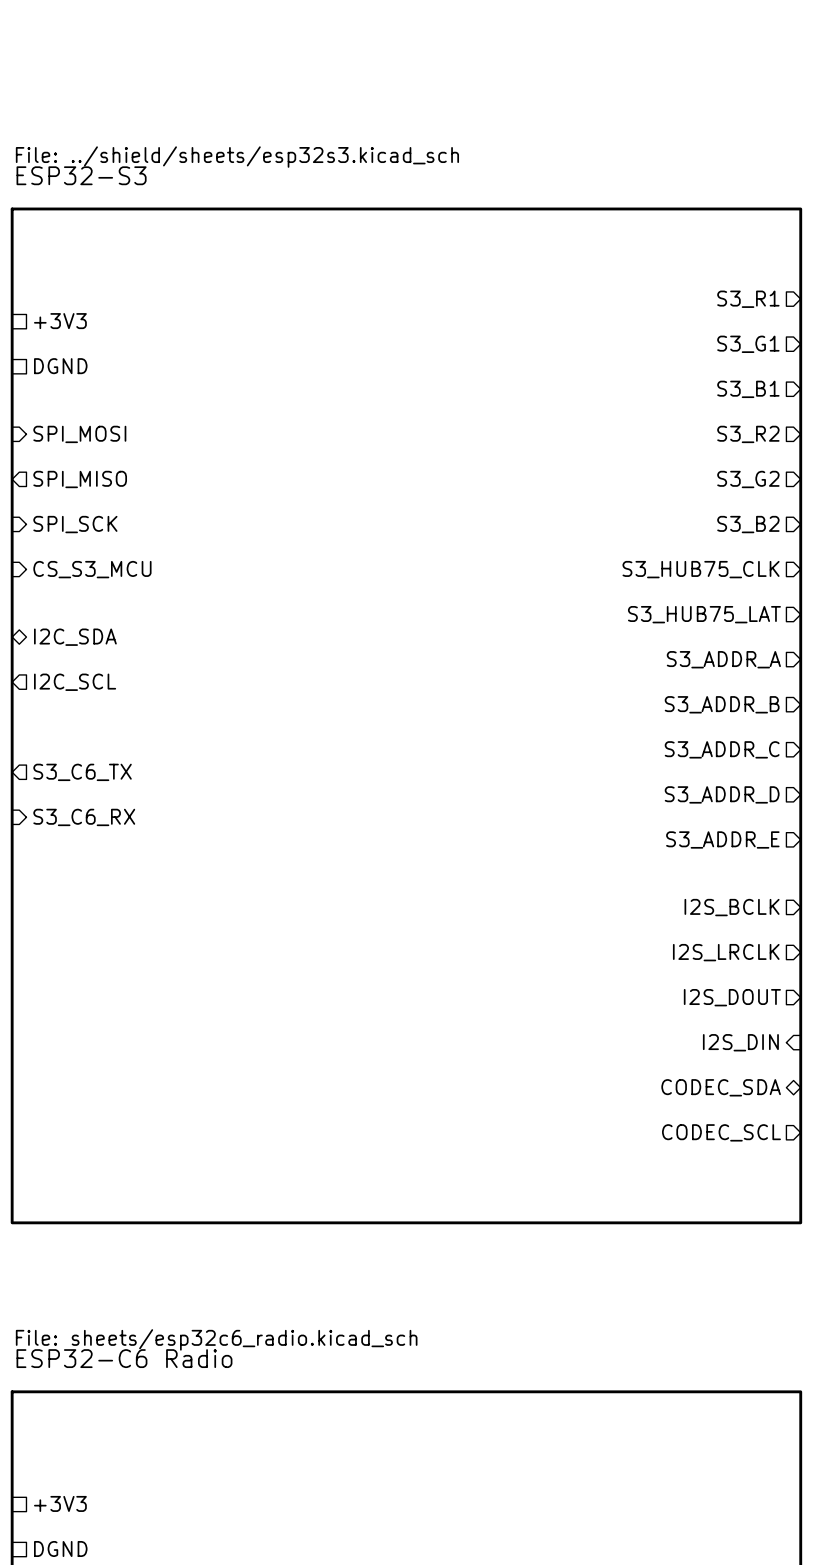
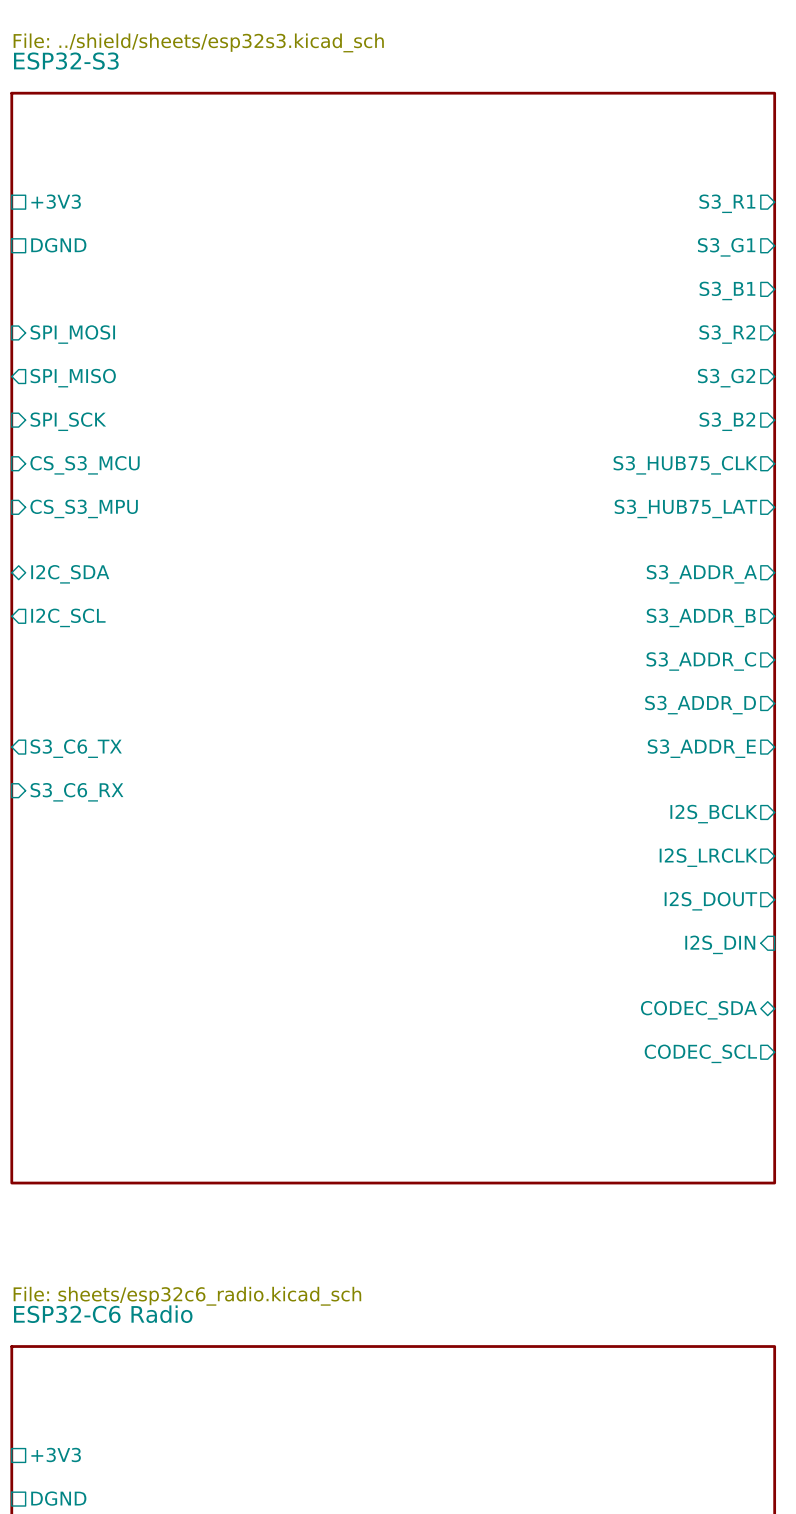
sheet ESP32-S3 value position: File: ../shield/sheets/esp32s3.kicad_sch (237, 157) -> File: ../shield/sheets/esp32s3.kicad_sch (198, 42)
sheet ESP32-S3 name position: ESP32-S3 (81, 175) -> ESP32-S3 (66, 61)
sheet ESP32-S3 shape: [10, 207, 803, 1225] -> [10, 91, 777, 1185]
sheet pin: none -> S3_R1 (727, 203)
sheet pin: none -> S3_G1 (726, 247)
sheet pin: S3_R1 (748, 299) -> S3_B1 (727, 290)
sheet pin position: +3V3 (60, 321) -> +3V3 (56, 201)
sheet pin: none -> SPI_MOSI (72, 334)
sheet pin: S3_G1 (748, 344) -> S3_R2 (727, 334)
sheet pin position: DGND (60, 366) -> DGND (58, 245)
sheet pin: none -> SPI_MISO (73, 378)
sheet pin: S3_B1 (748, 389) -> S3_G2 (726, 378)
sheet pin: SPI_MOSI (79, 434) -> SPI_SCK (68, 421)
sheet pin: S3_R2 (748, 434) -> S3_B2 (727, 421)
sheet pin shape: output (80, 479) -> input (85, 465)
sheet pin: SPI_MISO (80, 479) -> CS_S3_MCU (85, 465)
sheet pin: S3_G2 (748, 479) -> S3_HUB75_CLK (685, 465)
sheet pin: SPI_SCK (75, 524) -> CS_S3_MPU (84, 508)
sheet pin: S3_B2 (748, 524) -> S3_HUB75_LAT (685, 508)
sheet pin: CS_S3_MCU (92, 569) -> none
sheet pin: S3_HUB75_CLK (701, 569) -> none
sheet pin: none -> I2C_SDA (70, 574)
sheet pin: S3_HUB75_LAT (704, 614) -> none
sheet pin shape: bidirectional (75, 637) -> output (68, 617)
sheet pin: I2C_SDA (75, 637) -> I2C_SCL (68, 617)
sheet pin position: S3_ADDR_A (723, 659) -> S3_ADDR_A (701, 574)
sheet pin: I2C_SCL (75, 682) -> none
sheet pin position: S3_ADDR_B (722, 704) -> S3_ADDR_B (701, 617)
sheet pin position: S3_ADDR_C (722, 749) -> S3_ADDR_C (701, 661)
sheet pin: none -> S3_ADDR_E (701, 748)
sheet pin position: S3_ADDR_D (722, 794) -> S3_ADDR_D (700, 705)
sheet pin: S3_ADDR_E (722, 839) -> I2S_BCLK (713, 814)
sheet pin: I2S_BCLK (732, 907) -> none
sheet pin position: I2S_LRCLK (726, 952) -> I2S_LRCLK (708, 857)
sheet pin: none -> I2S_DIN (720, 944)
sheet pin position: I2S_DOUT (732, 997) -> I2S_DOUT (710, 901)
sheet pin shape: input (740, 1042) -> bidirectional (698, 1010)
sheet pin: I2S_DIN (740, 1042) -> CODEC_SDA (698, 1010)
sheet pin shape: bidirectional (721, 1087) -> output (700, 1053)
sheet pin: CODEC_SDA (721, 1087) -> CODEC_SCL (700, 1053)
sheet pin: CODEC_SCL (721, 1132) -> none

